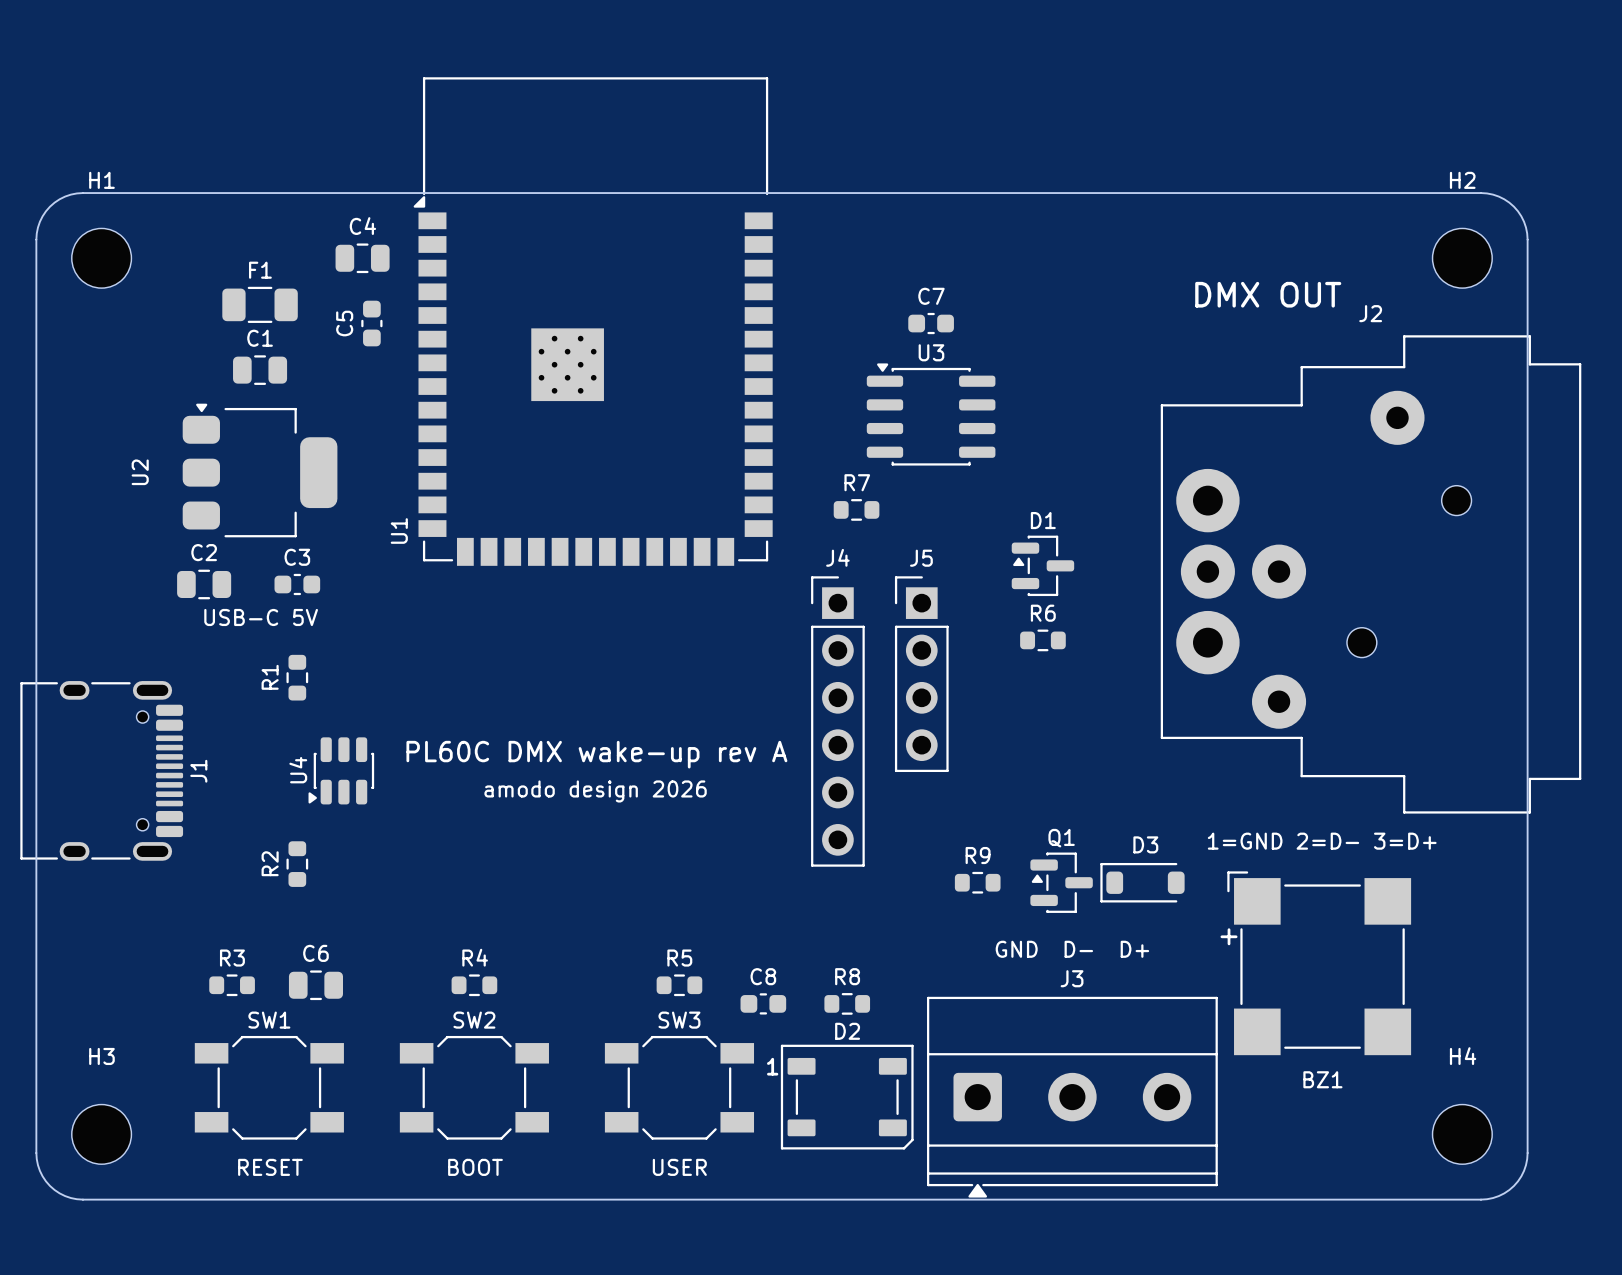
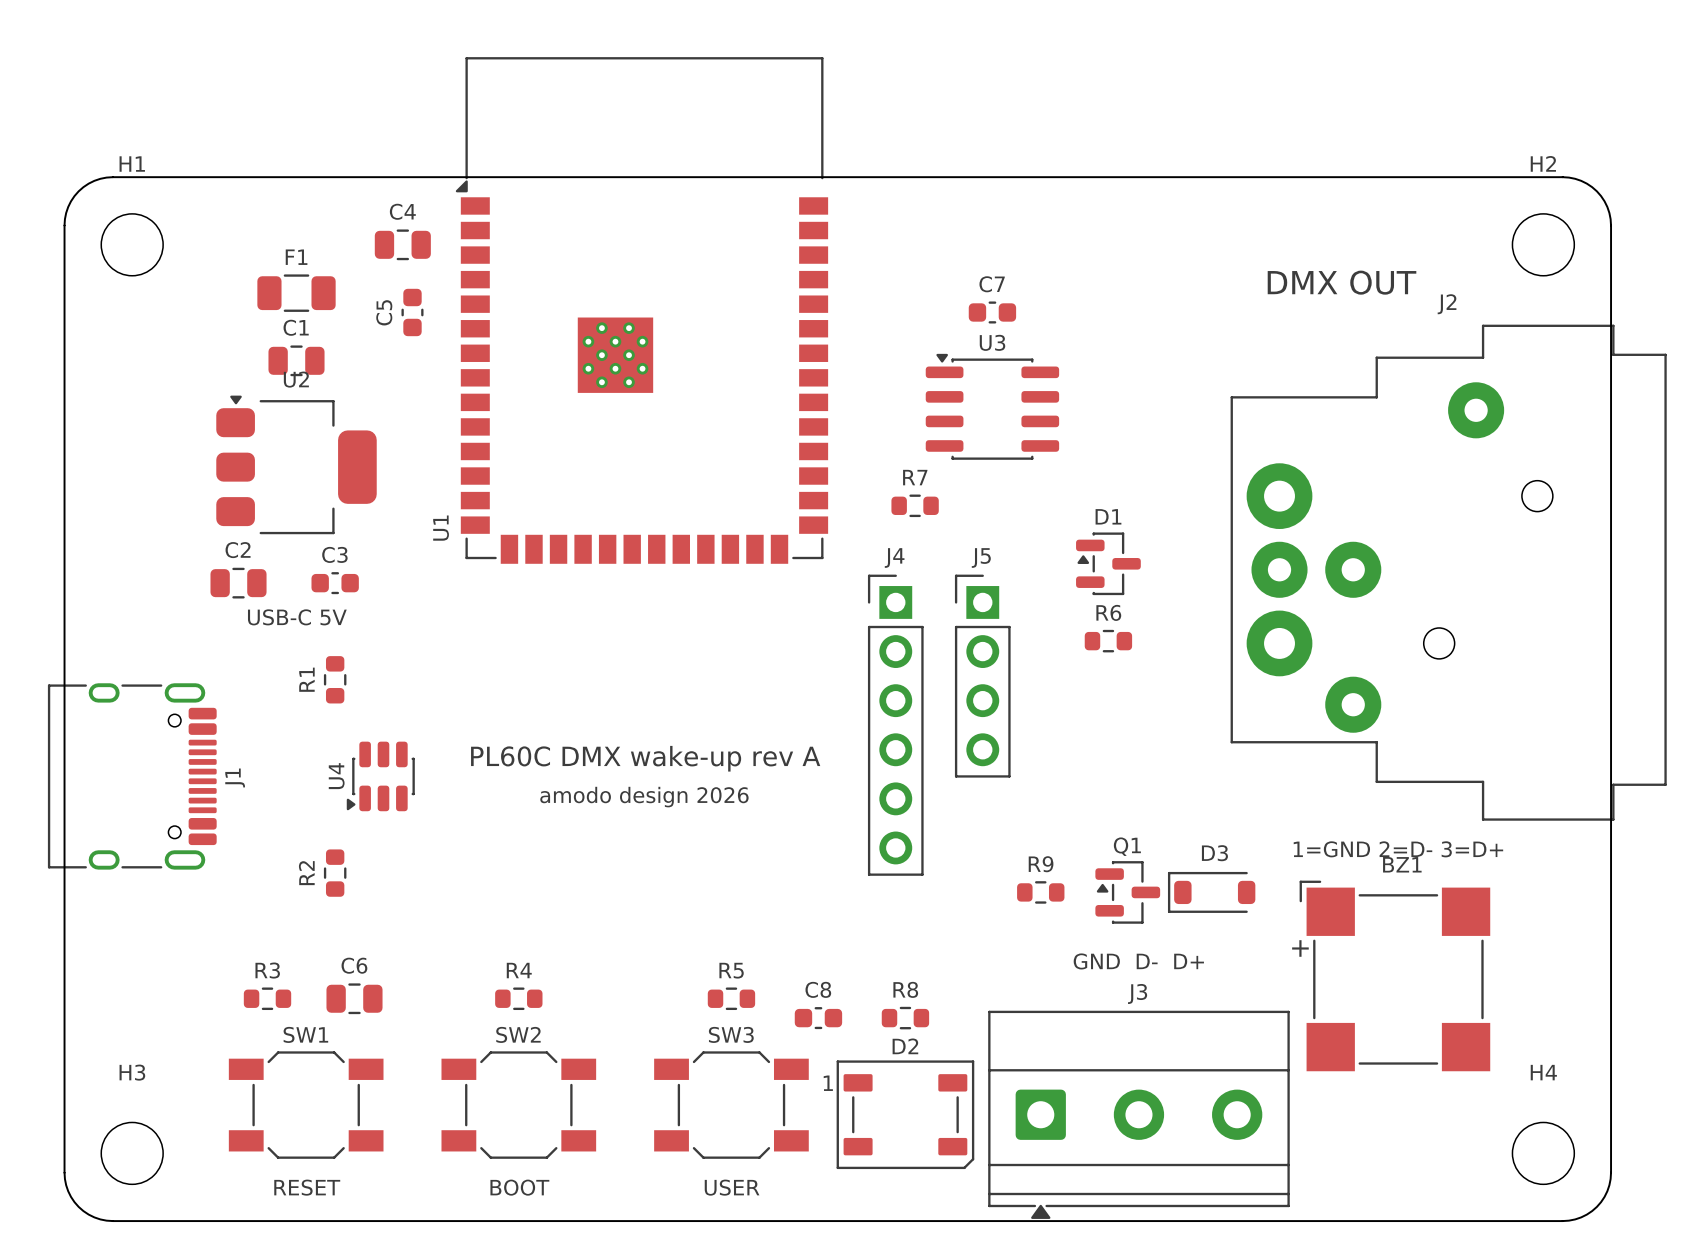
U2 name rotation: 0° (140, 472) -> 90° clockwise (296, 379)
U2 name position: U2 (140, 472) -> U2 (296, 379)
BZ1 name position: BZ1 (1322, 1079) -> BZ1 (1402, 864)

